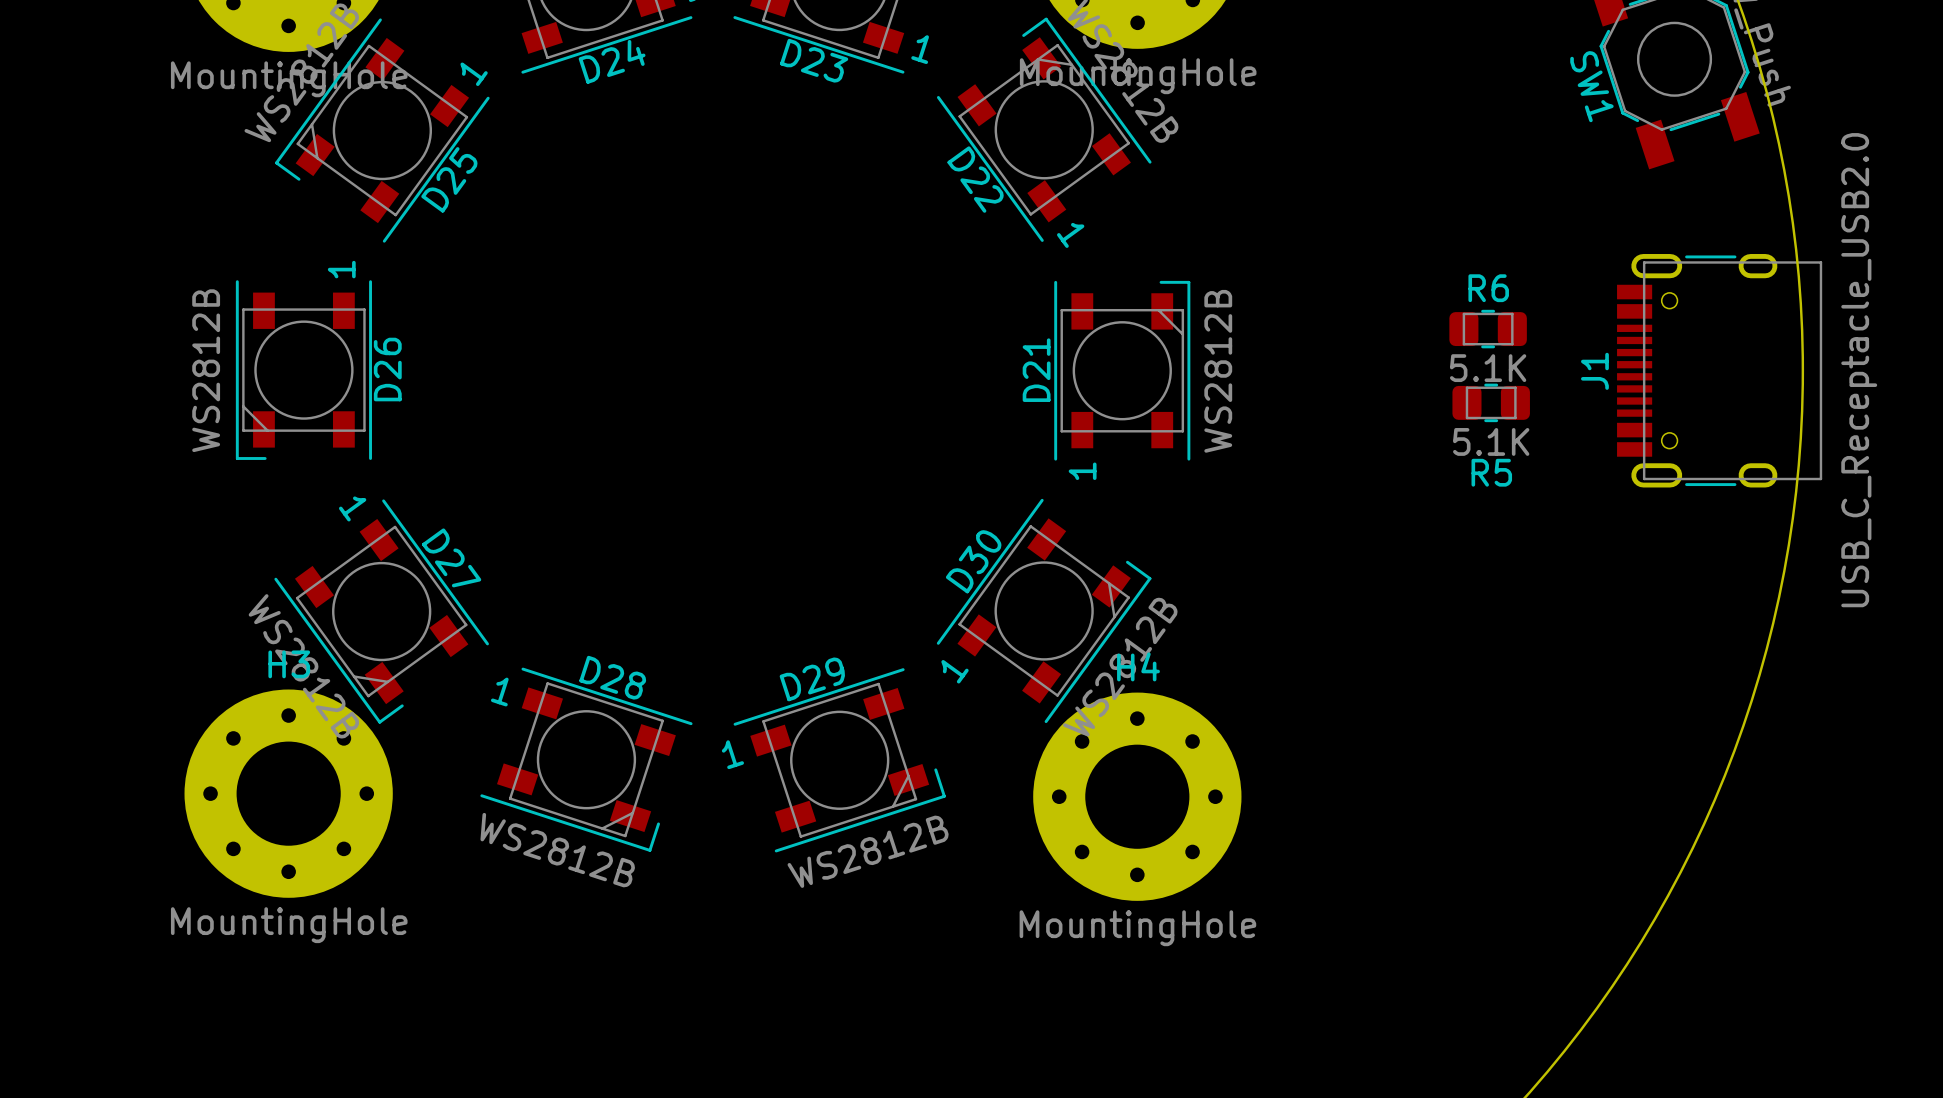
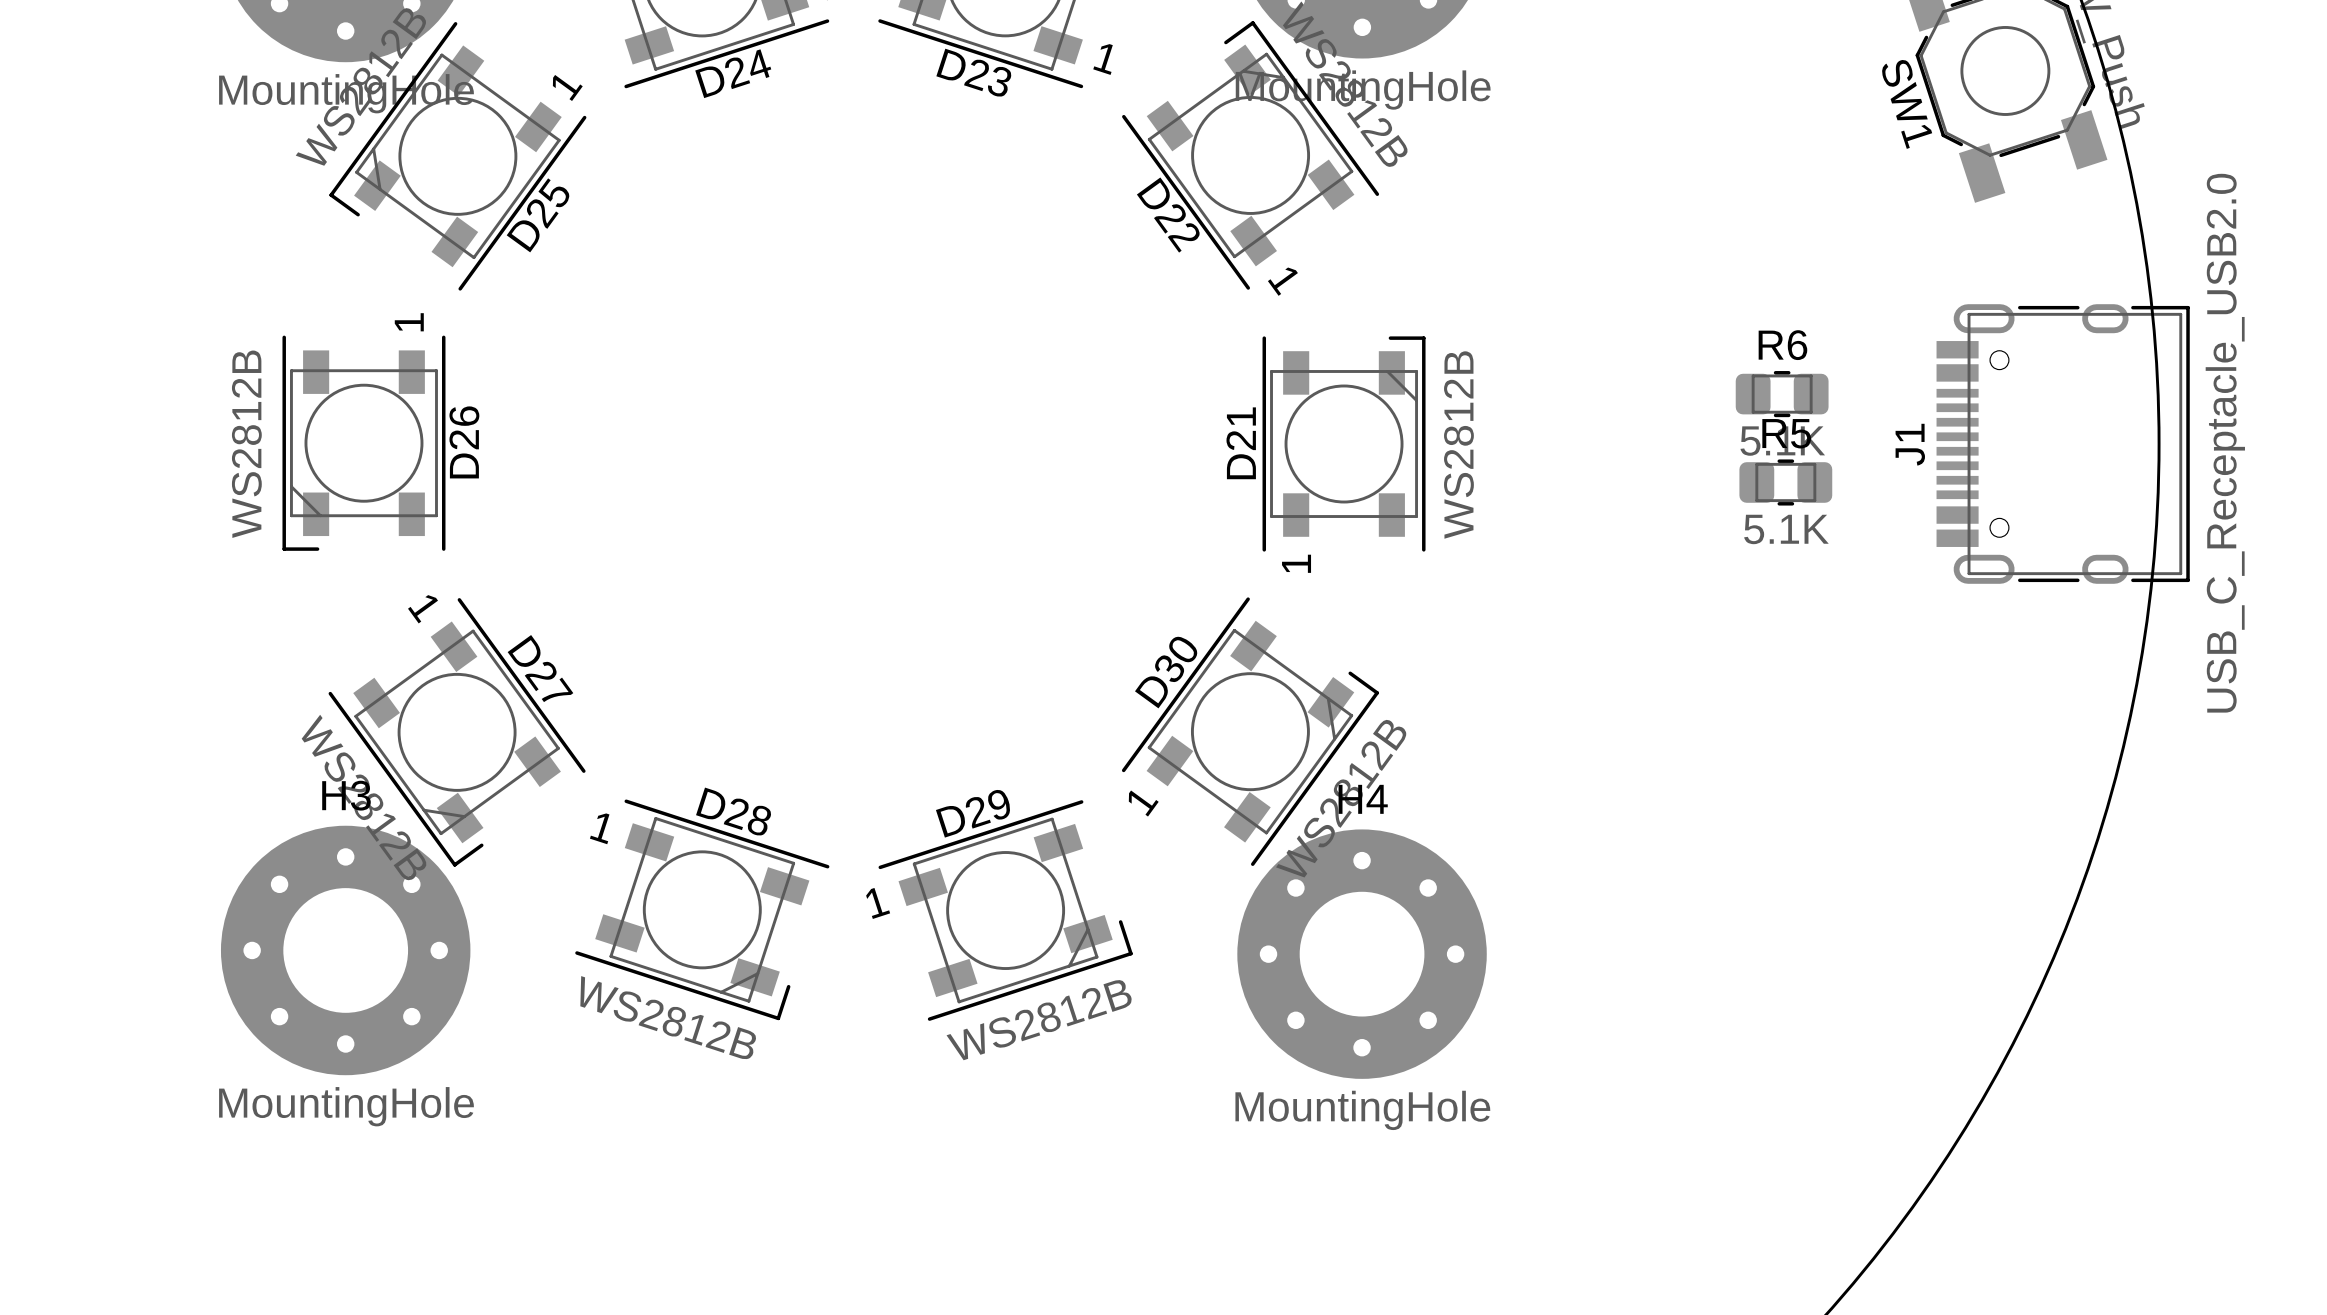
J1 footprint: [1617, 254, 1823, 488] -> [1936, 304, 2190, 584]
R5 name position: R5 (1491, 472) -> R5 (1786, 433)

